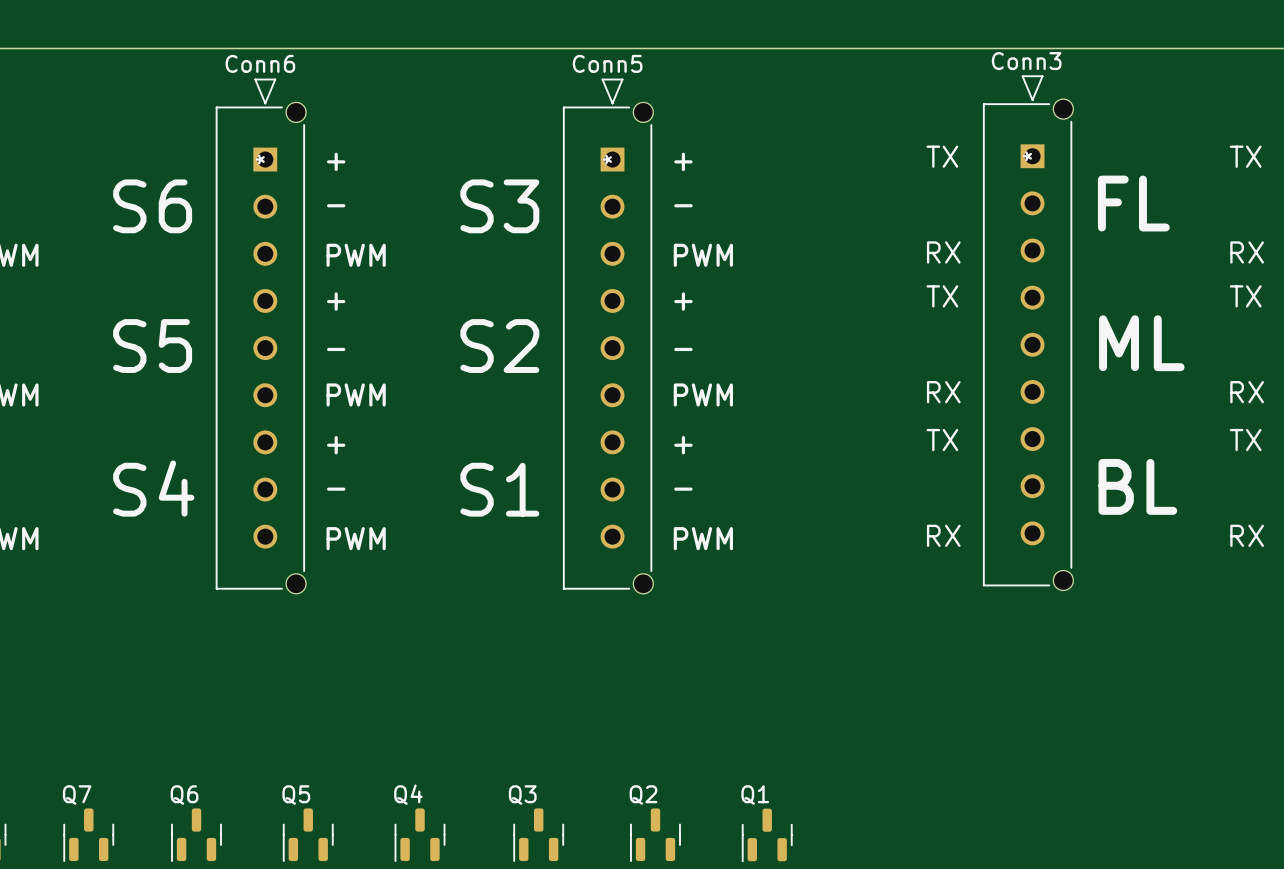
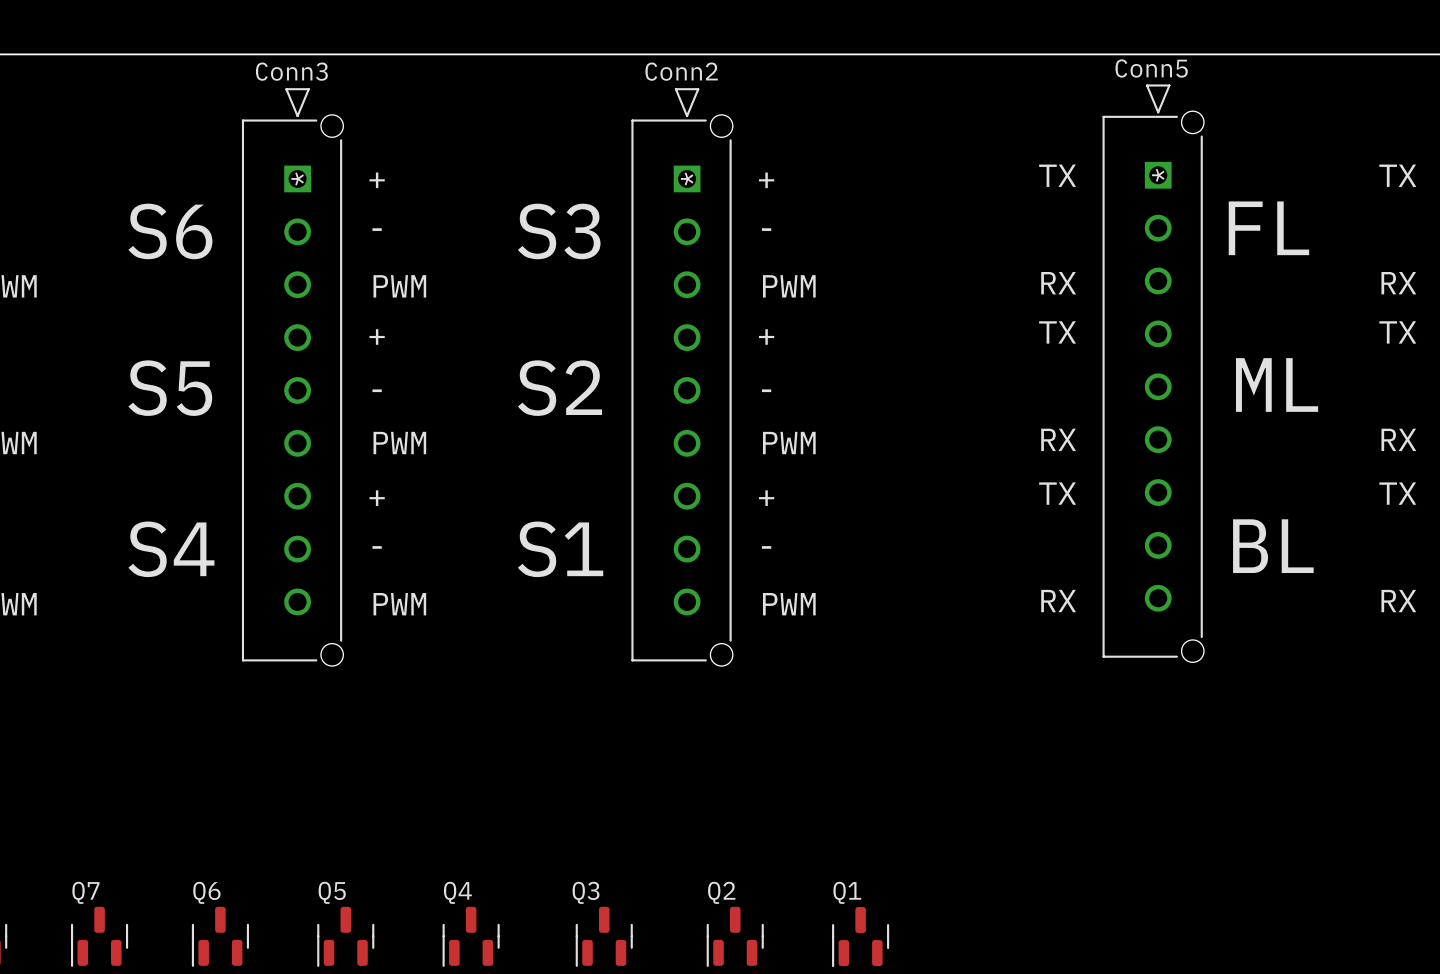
Conn3 name: Conn3 (1026, 61) -> Conn5 (1151, 68)
Conn6 name: Conn6 (260, 63) -> Conn3 (291, 71)
Conn5 name: Conn5 (607, 63) -> Conn2 (681, 71)

